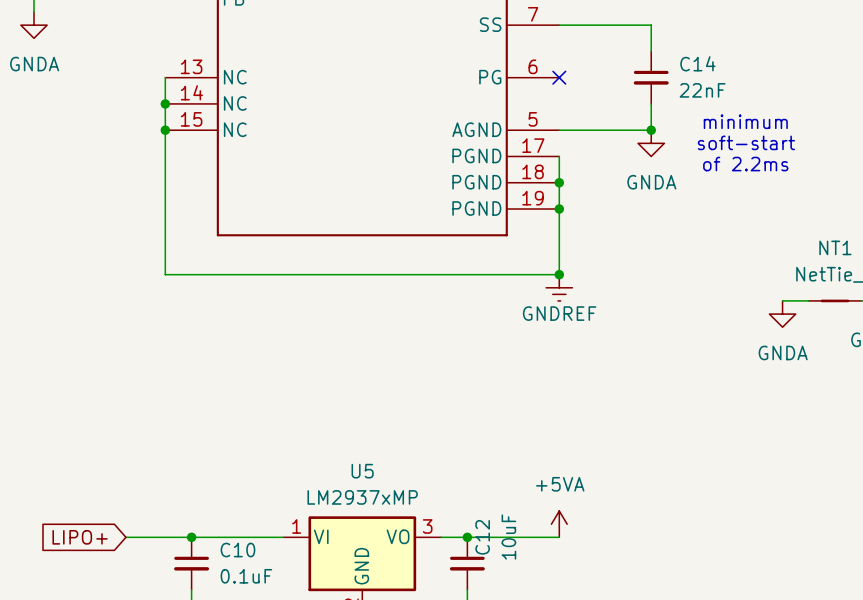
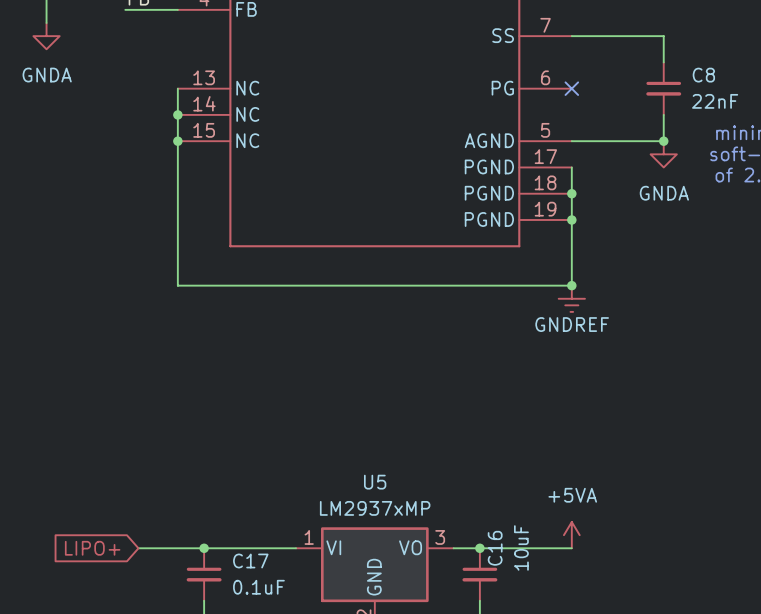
C14 name: C14 (697, 63) -> C8 (703, 75)
C12 name: C12 (482, 537) -> C16 (495, 548)
C10 name: C10 (237, 550) -> C17 (250, 560)

